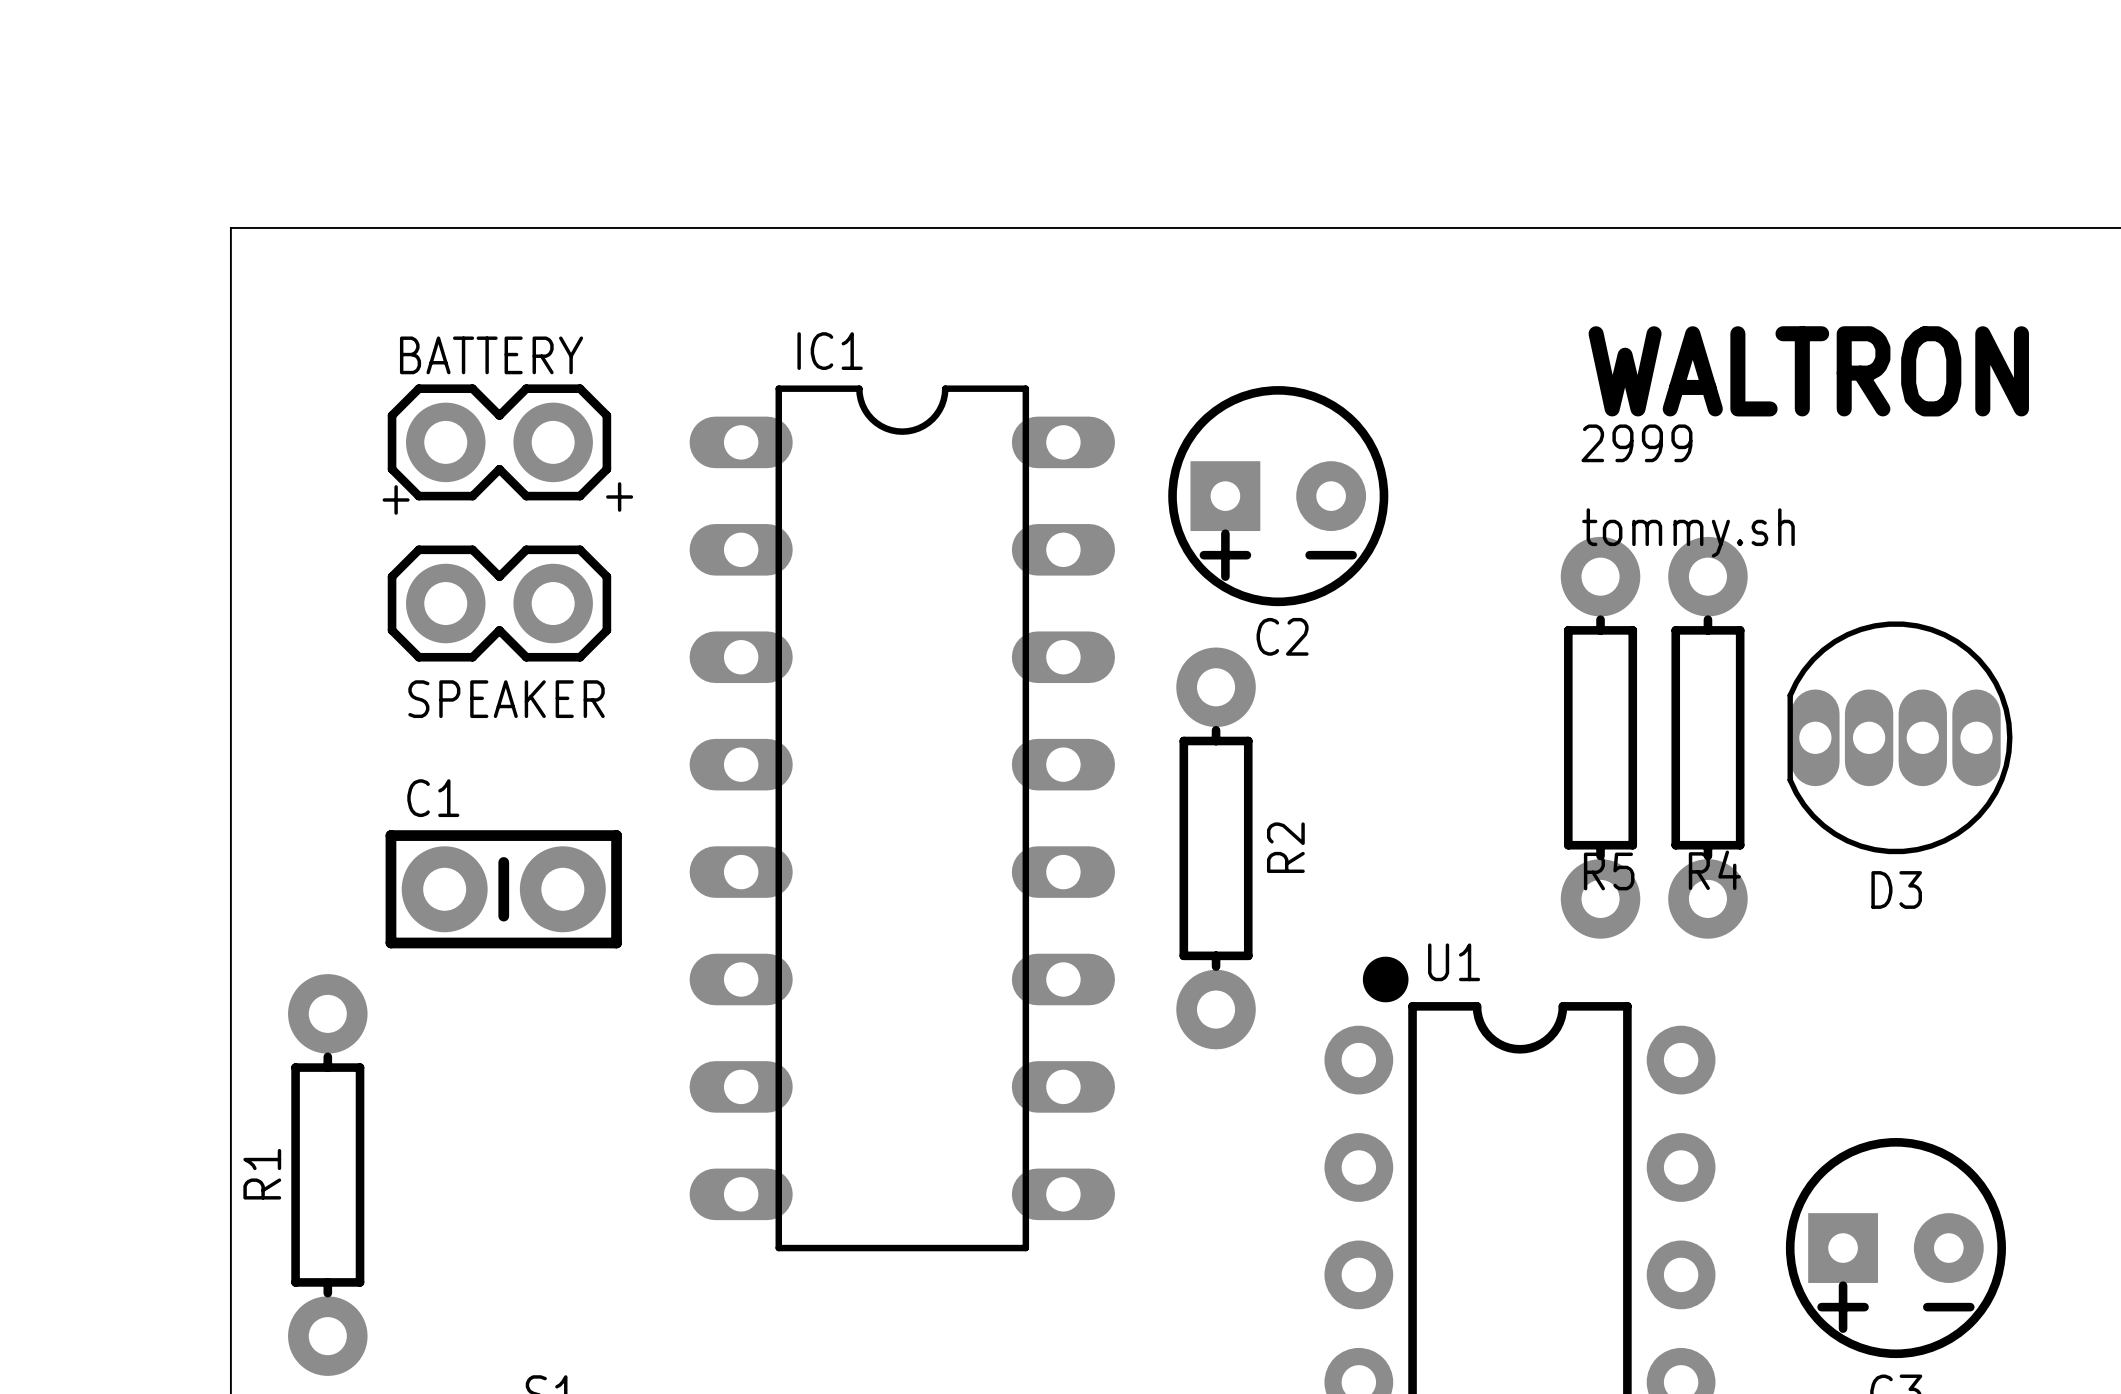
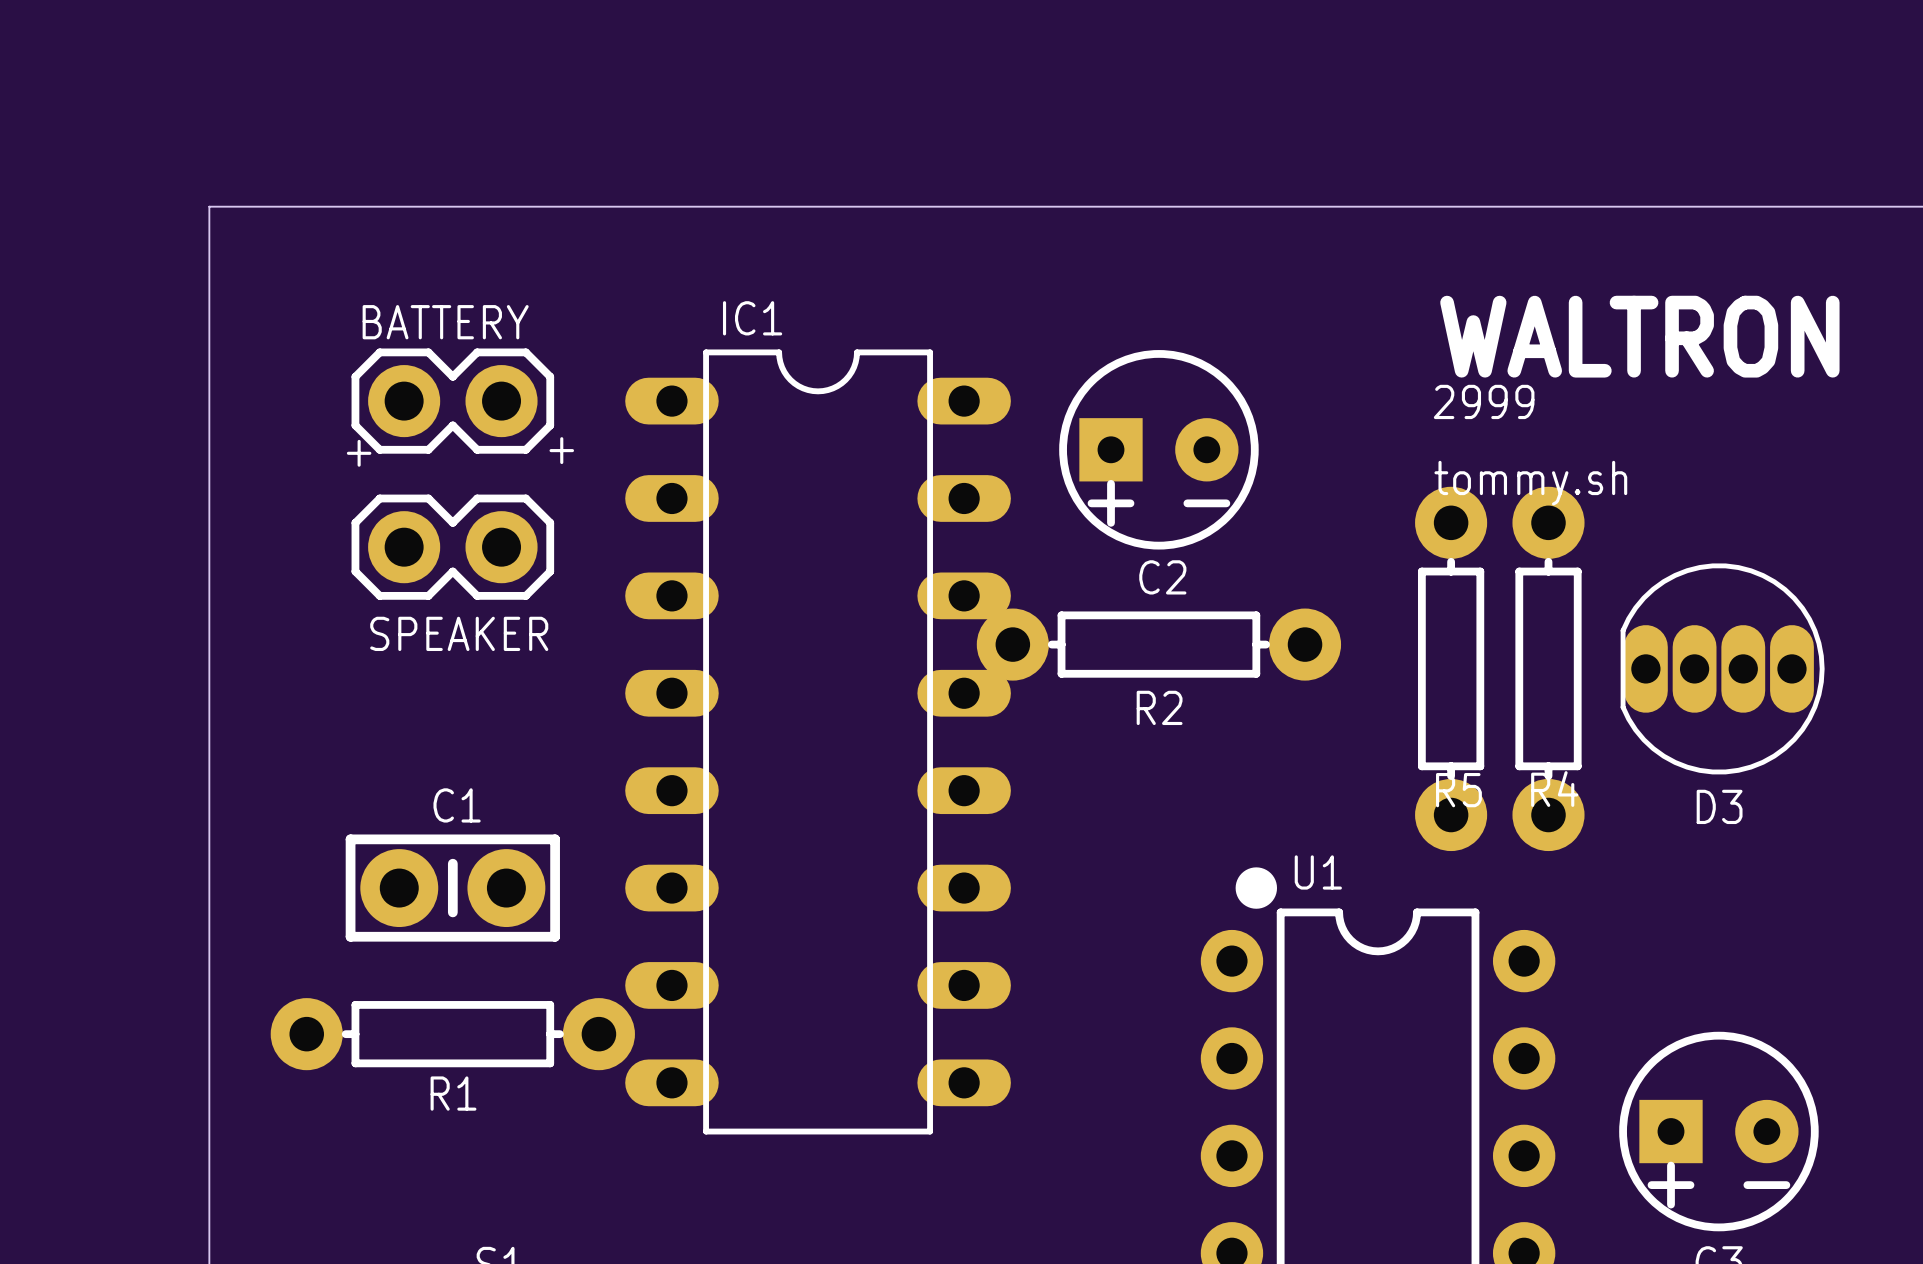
text position: C1 (433, 798) -> C1 (457, 805)
R2 rotation: 0° (1216, 848) -> 90° clockwise (1158, 644)
part position: (503, 889) -> (452, 888)
R1 name position: R1 (262, 1174) -> R1 (453, 1093)
R1 rotation: 0° (327, 1175) -> 90° clockwise (452, 1034)

